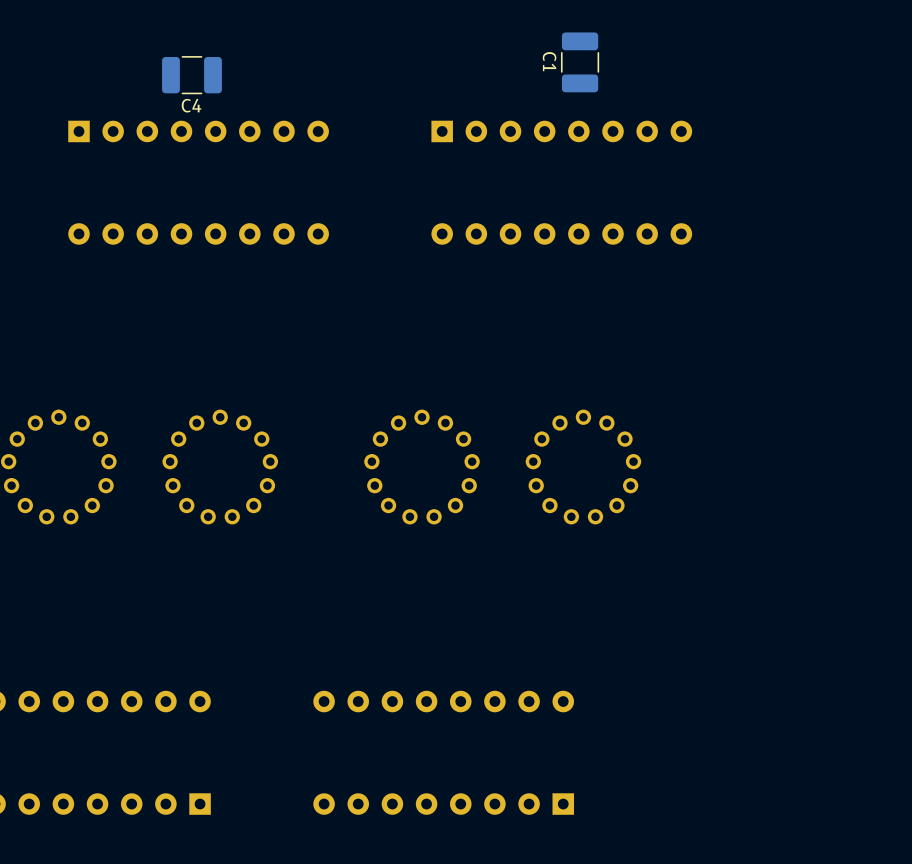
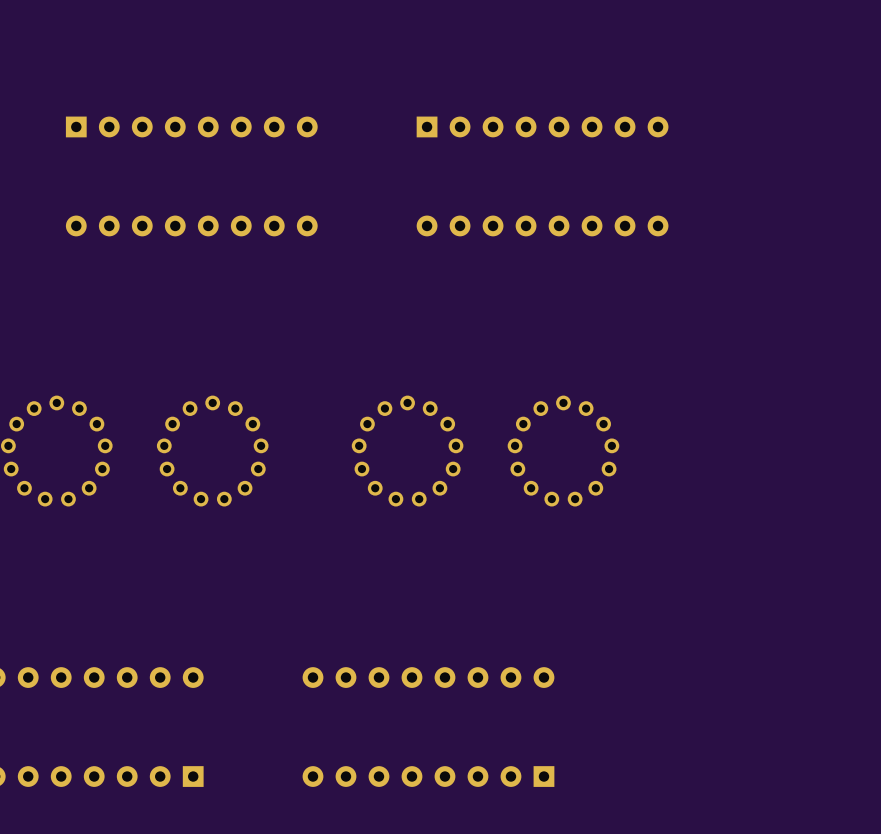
C1: (580, 62) -> none
C4: (191, 75) -> none

